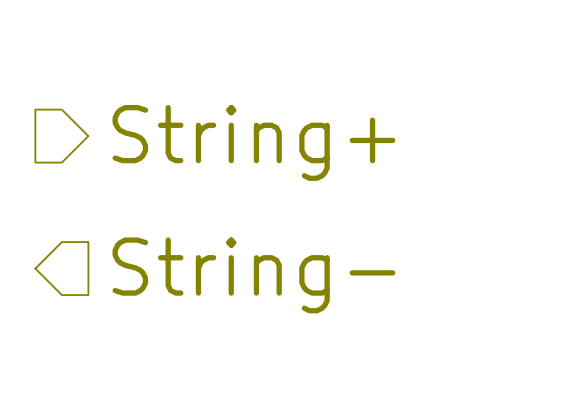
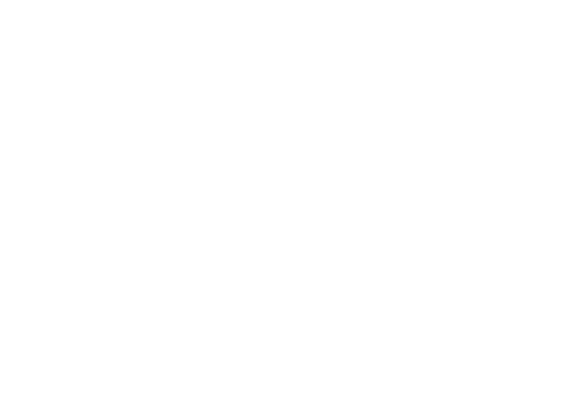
hierarchical label: String+ (253, 142) -> none
hierarchical label: String- (253, 275) -> none

